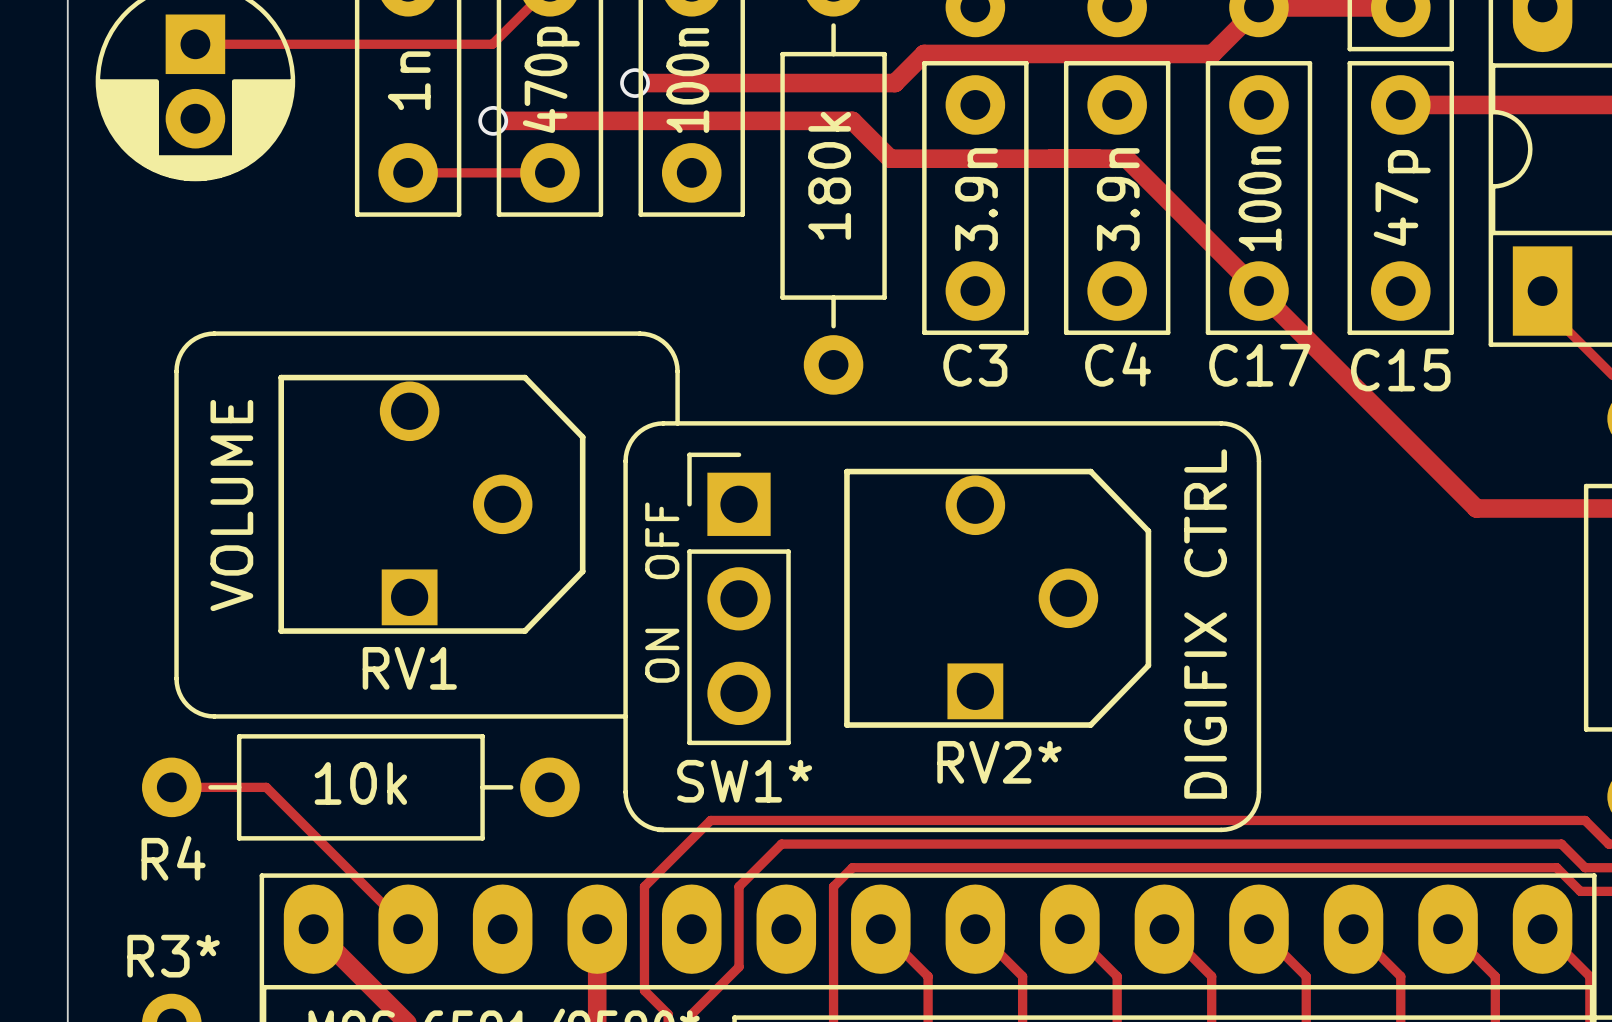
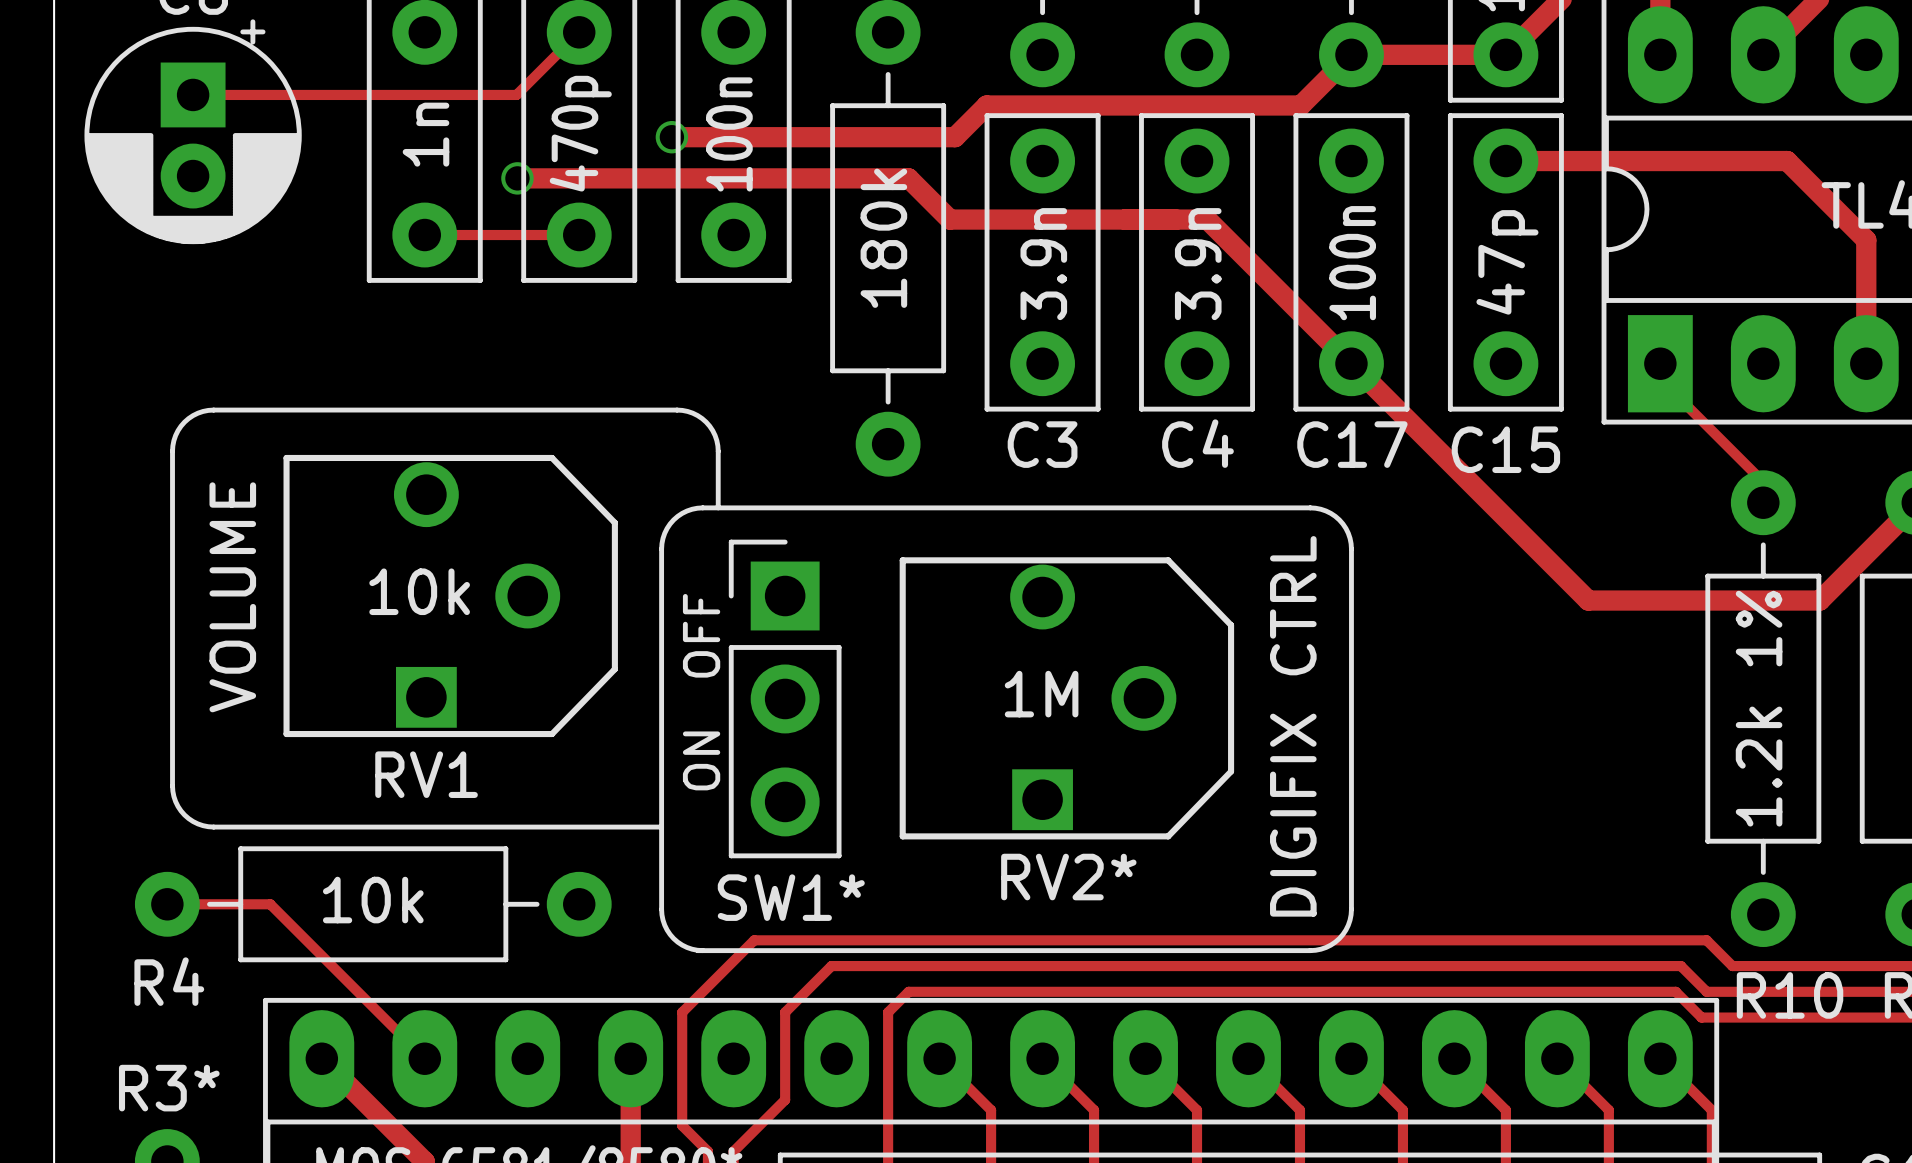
RV1 value: none -> 10k (419, 591)
part value: none -> 1M (1041, 694)

